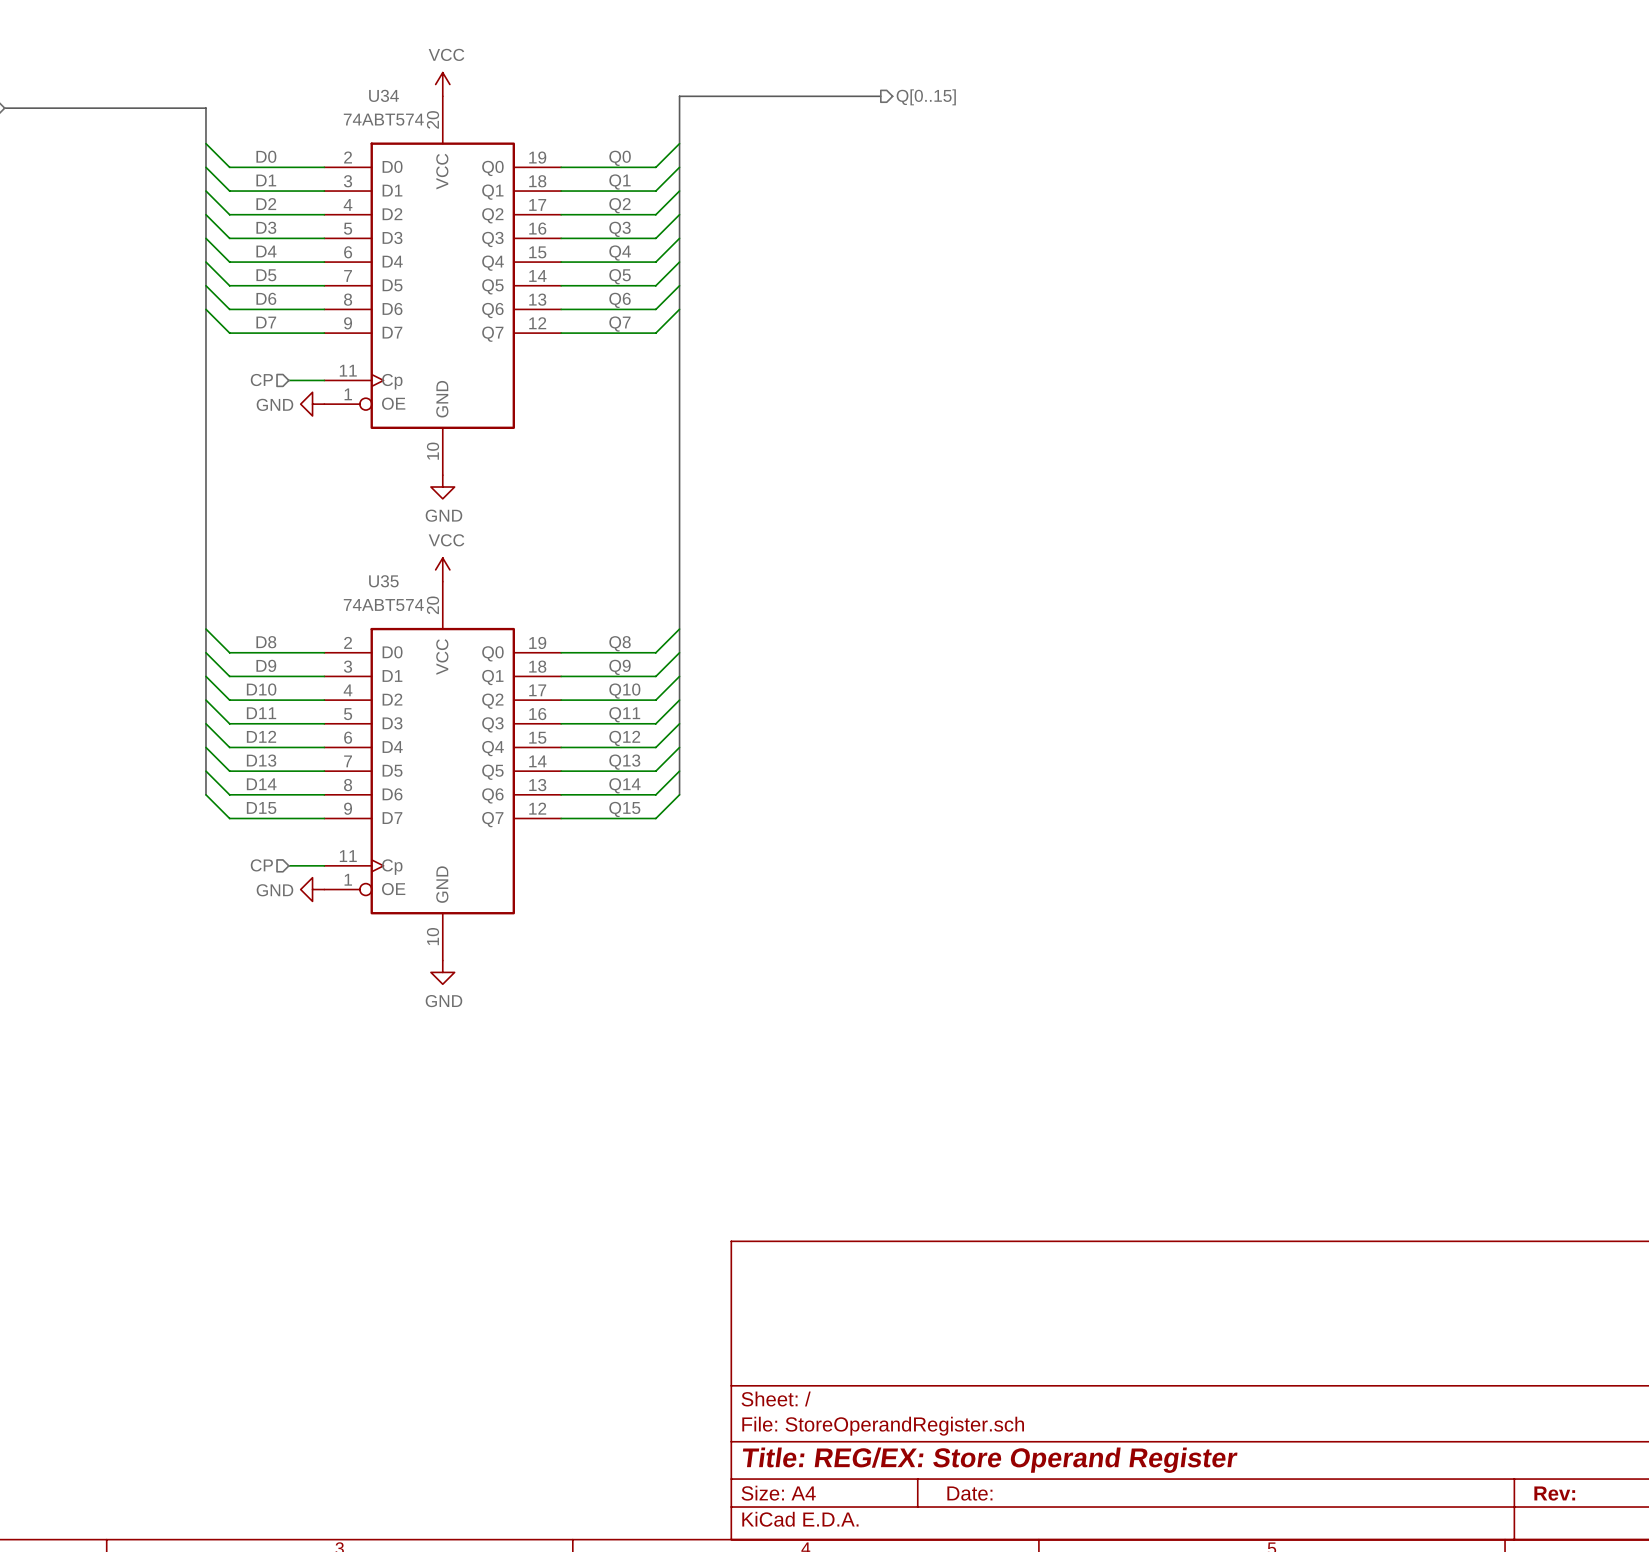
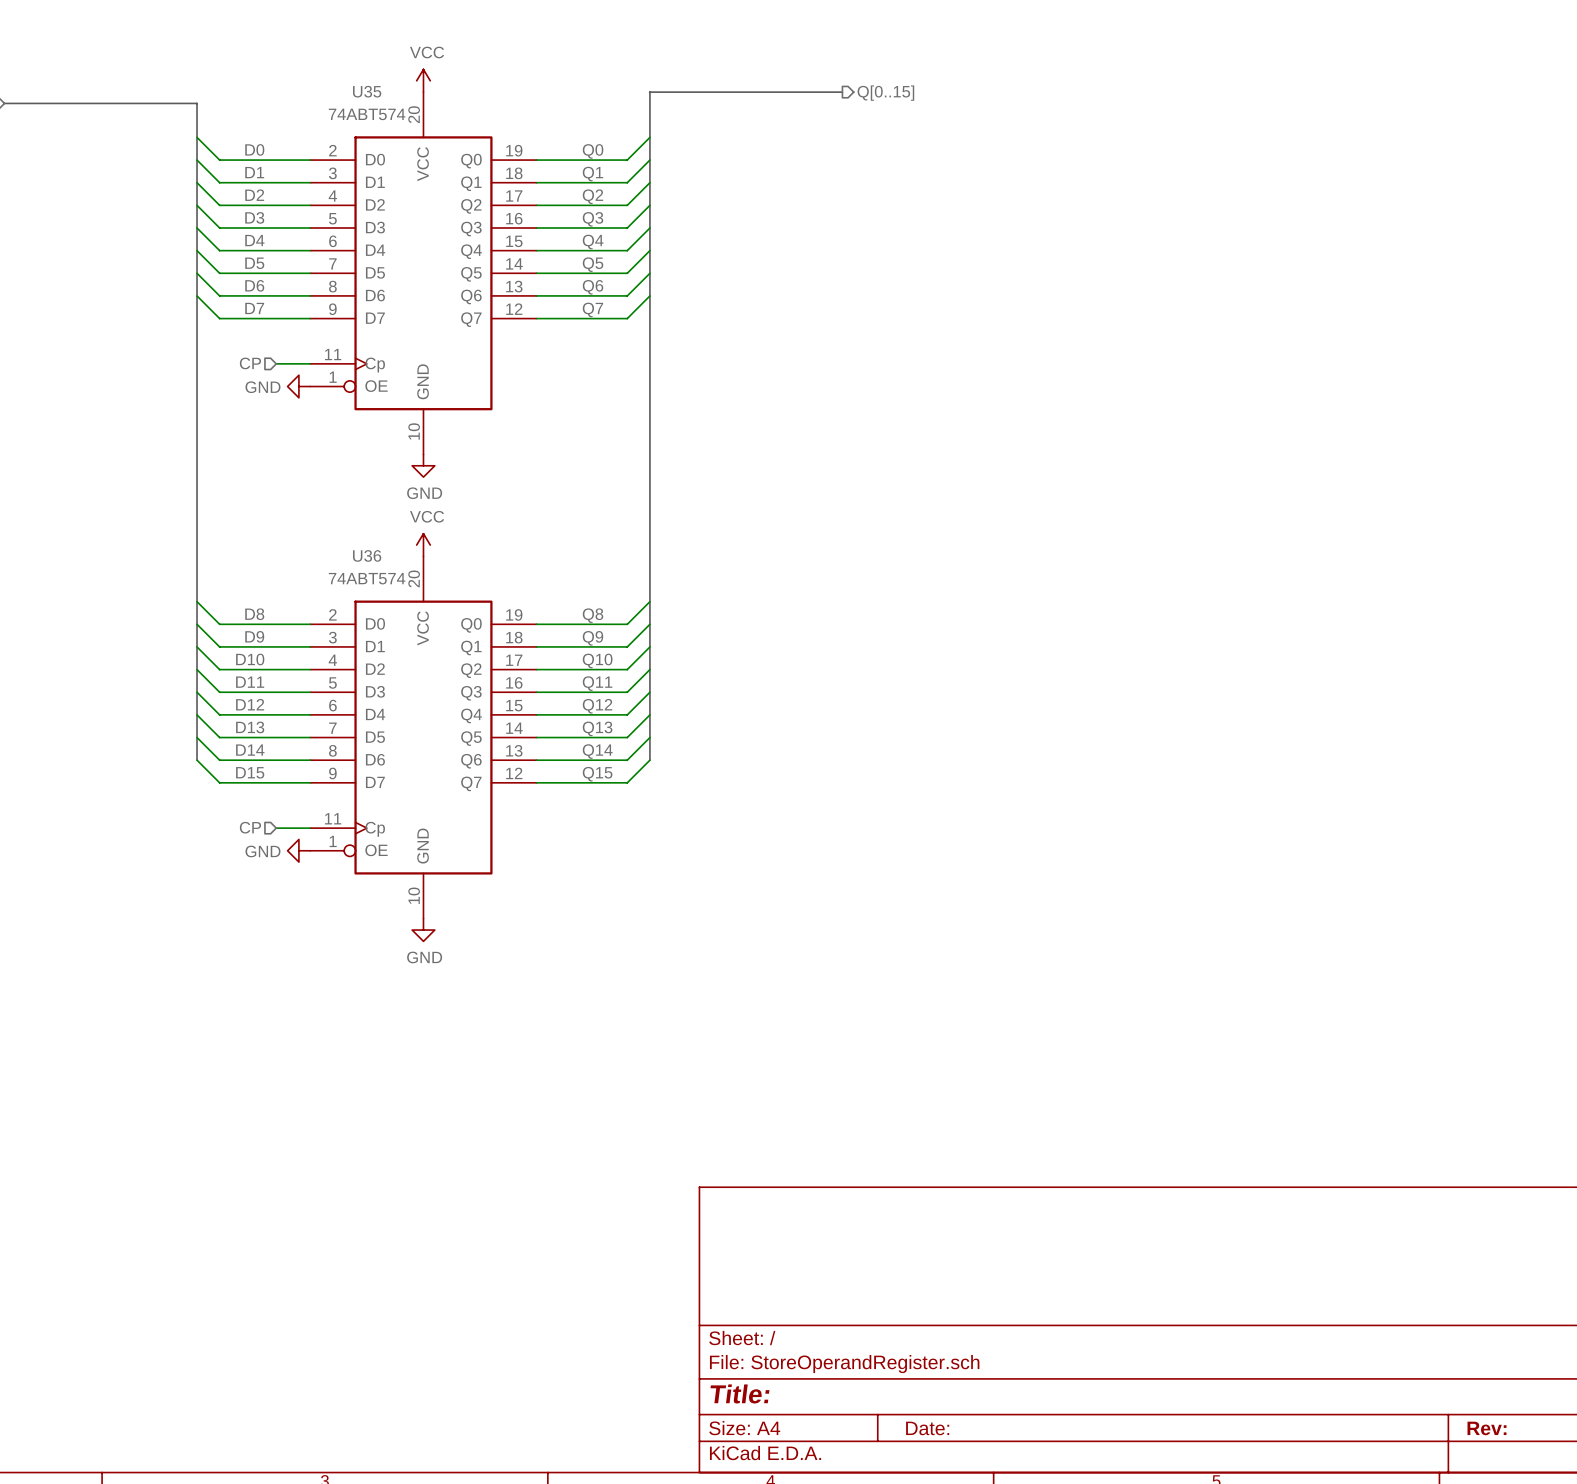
U34 name: U34 (383, 95) -> U35 (367, 91)
U35 name: U35 (383, 581) -> U36 (367, 555)
title block: Title: REG/EX: Store Operand Register (990, 1460) -> Title: (739, 1393)

